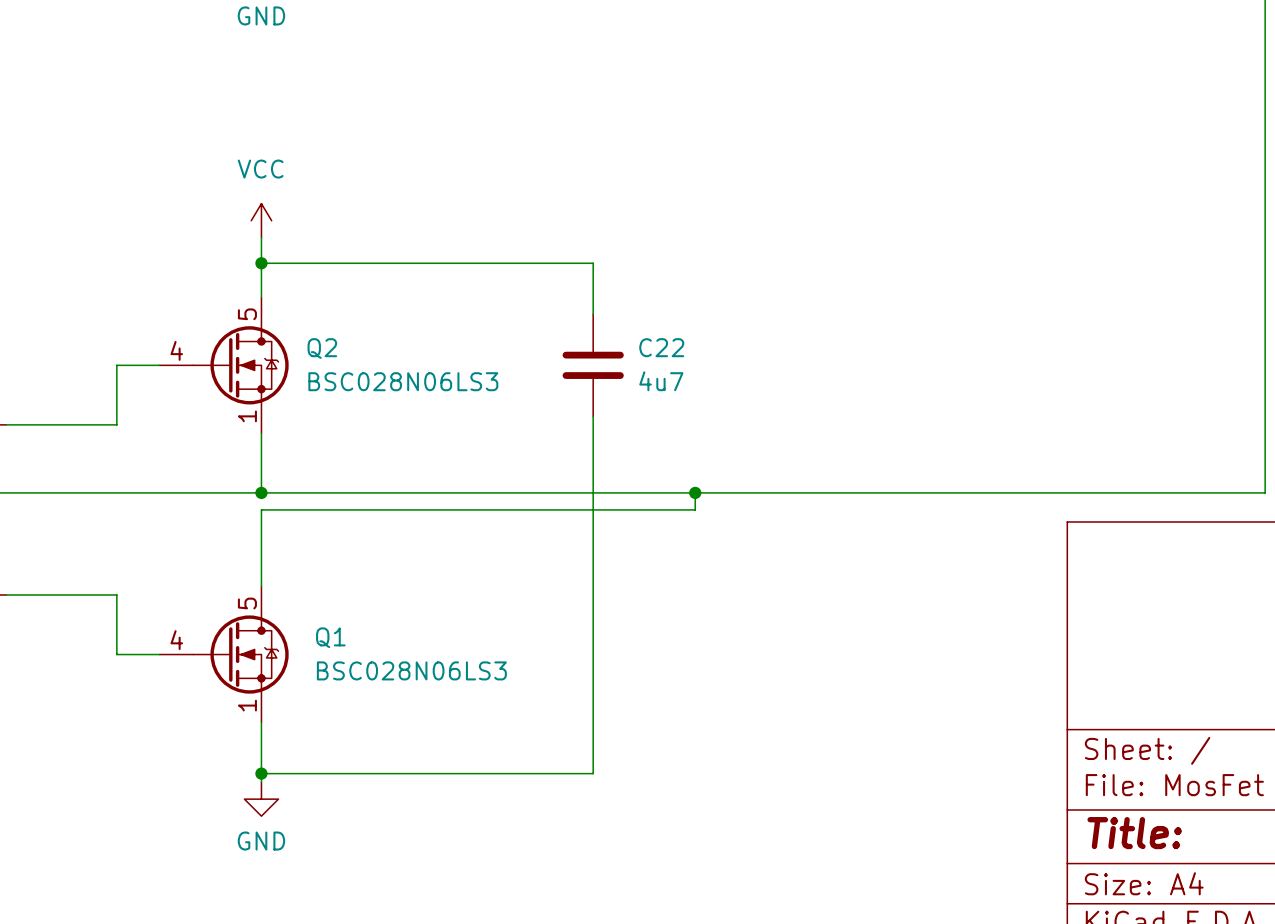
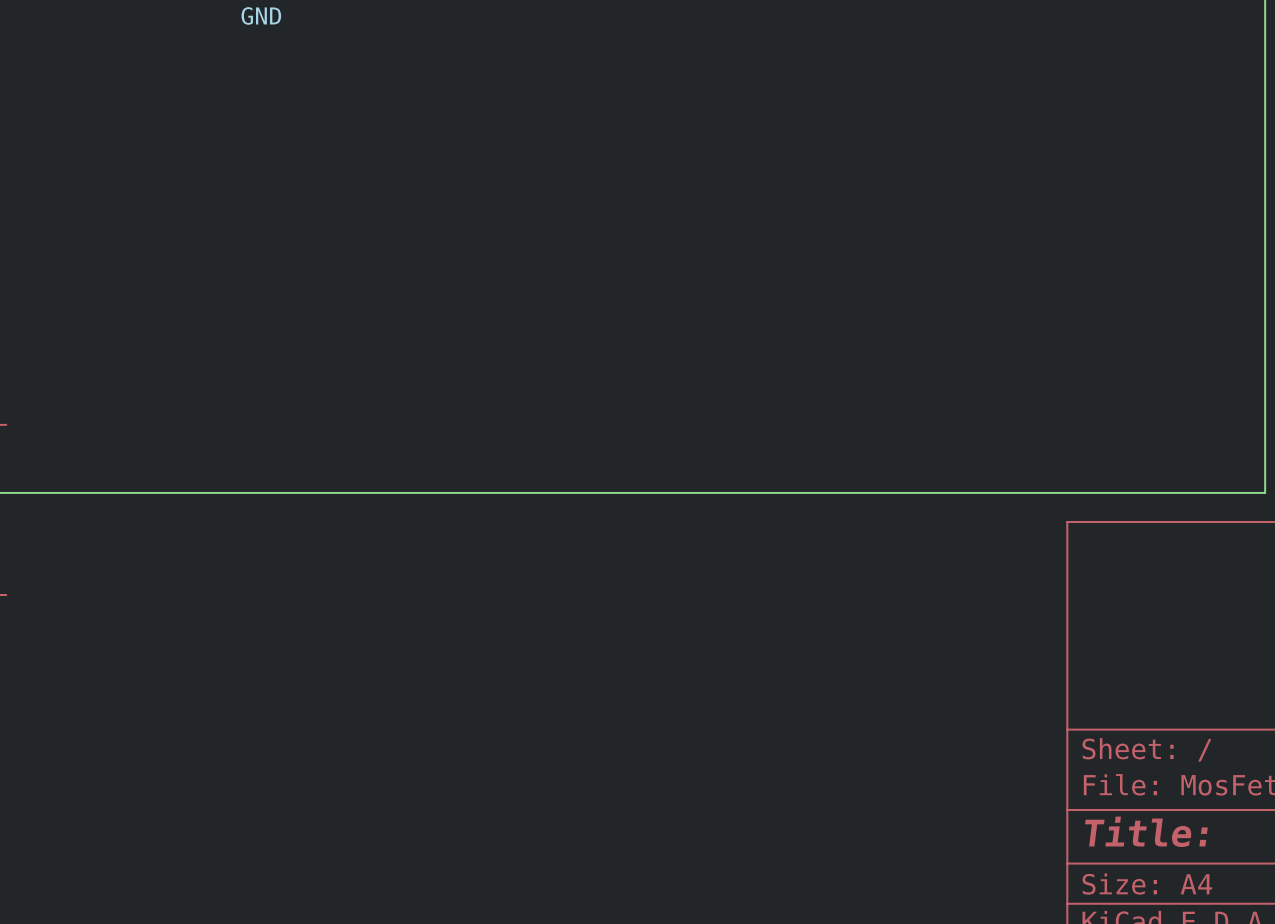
power symbol: VCC (261, 220) -> none
wire: (261, 237) (261, 297) -> none
wire: (261, 263) (593, 263) (593, 314) -> none
junction: (261, 263) -> none
wire: (159, 365) (116, 365) (116, 424) (6, 424) -> none
Q2: BSC028N06LS3 (224, 365) -> none
C22: 4u7 (593, 365) -> none
wire: (593, 416) (593, 773) (261, 773) -> none
wire: (261, 433) (261, 492) -> none
junction: (261, 492) -> none
wire: (695, 492) (695, 509) (261, 509) (261, 586) -> none
junction: (695, 492) -> none
wire: (6, 594) (116, 594) (116, 654) (159, 654) -> none
Q1: BSC028N06LS3 (224, 654) -> none
wire: (261, 722) (261, 782) -> none
junction: (261, 773) -> none
power symbol: GND (261, 799) -> none

